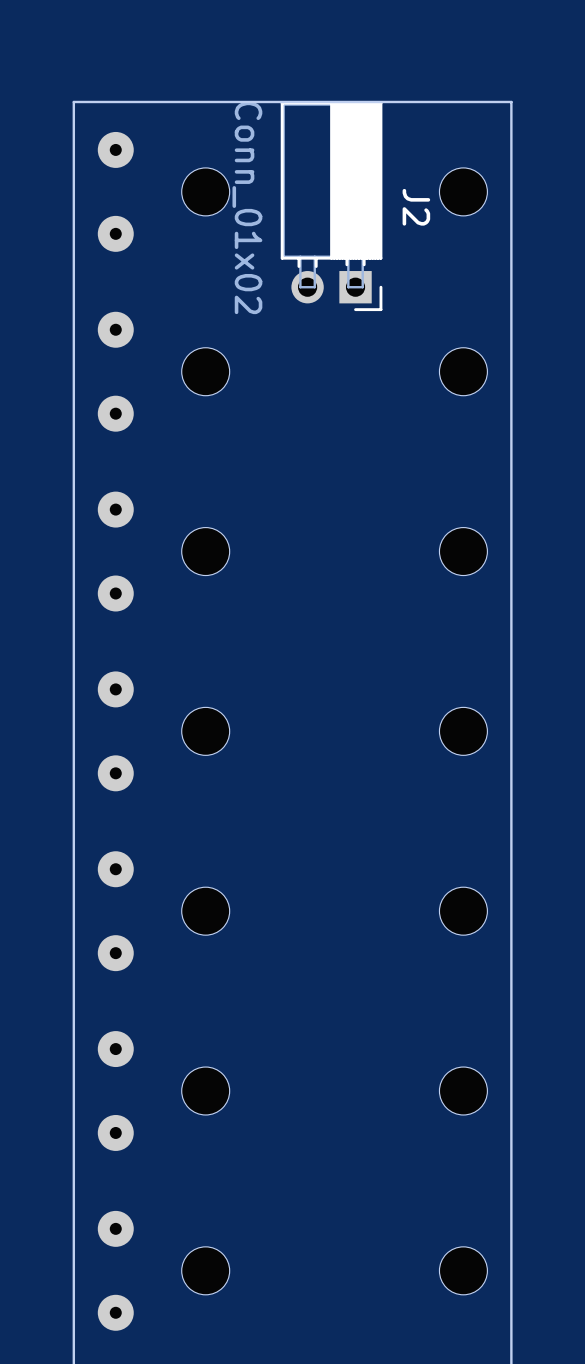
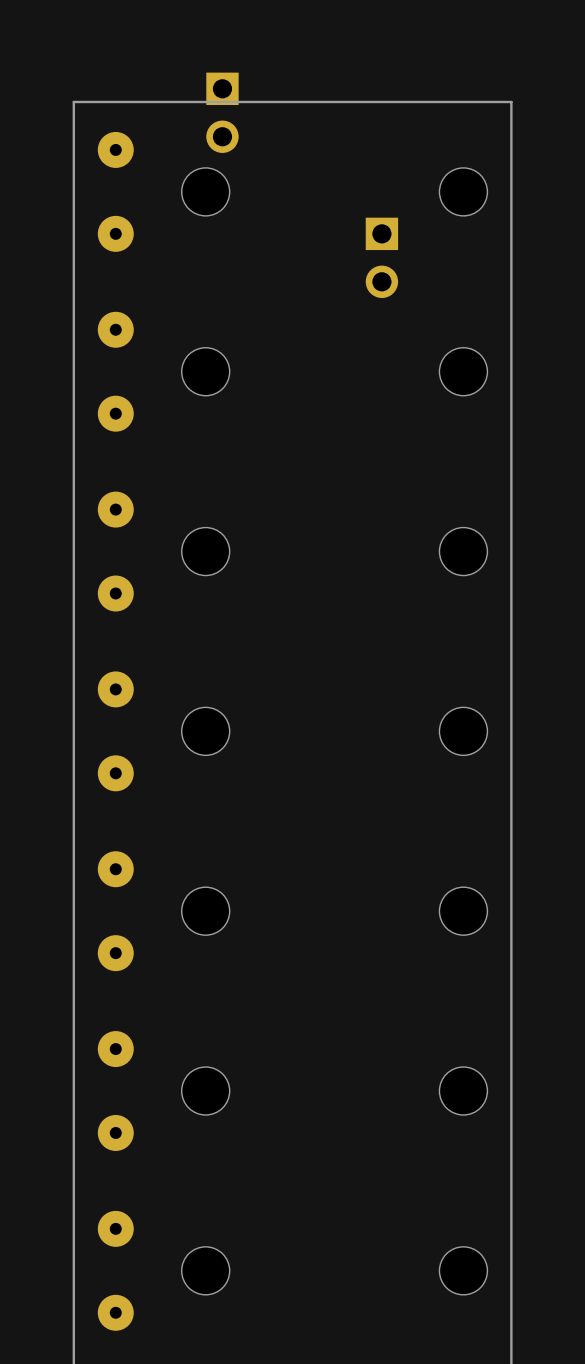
J2 side: bottom (331, 206) -> top (222, 112)
part: none -> (381, 257)

